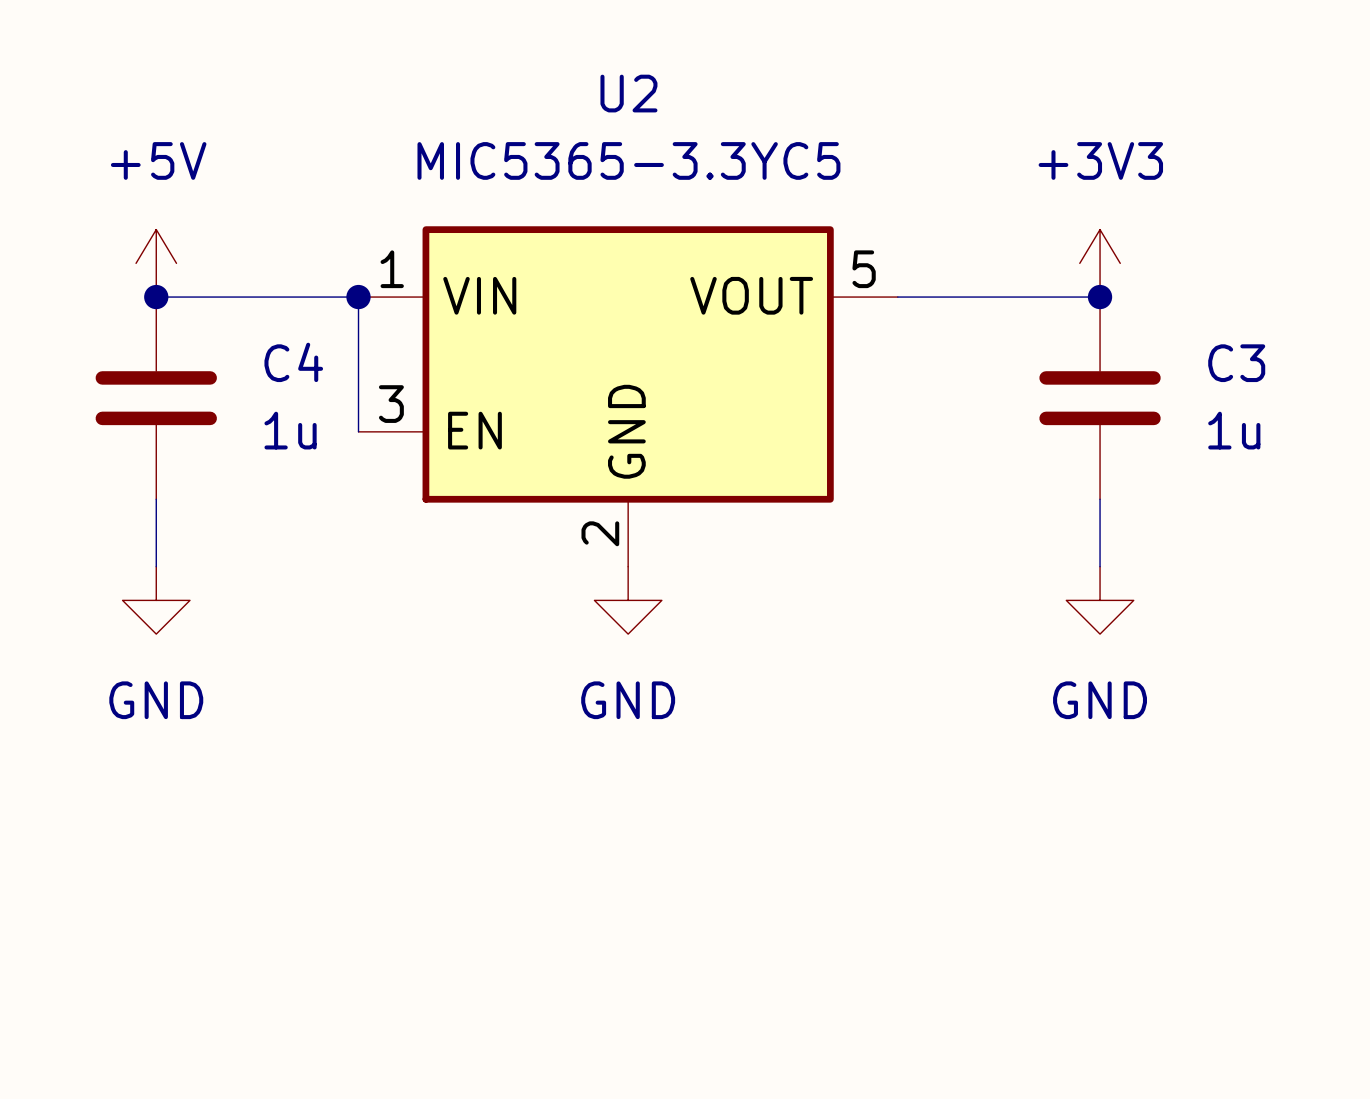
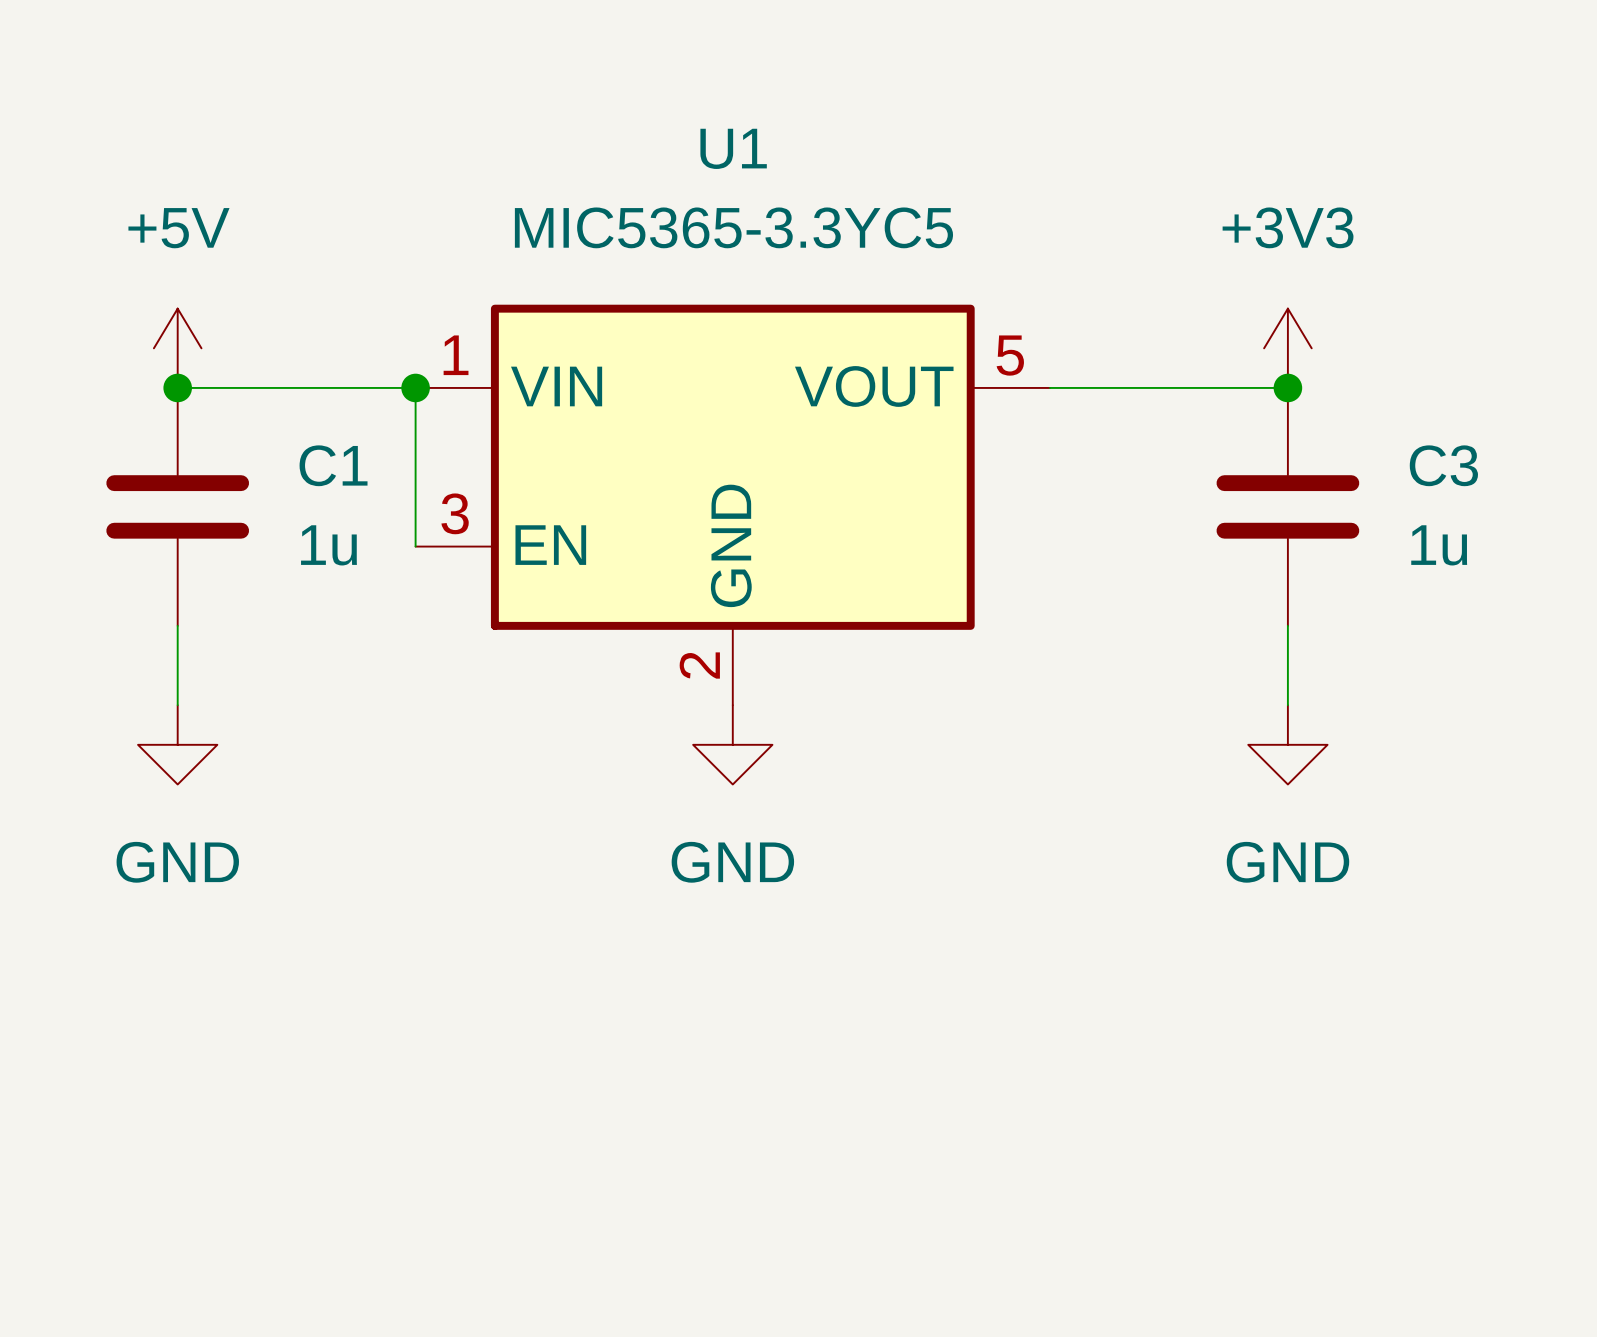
U2 name: U2 (628, 93) -> U1 (733, 148)
C4 name: C4 (293, 362) -> C1 (333, 465)

